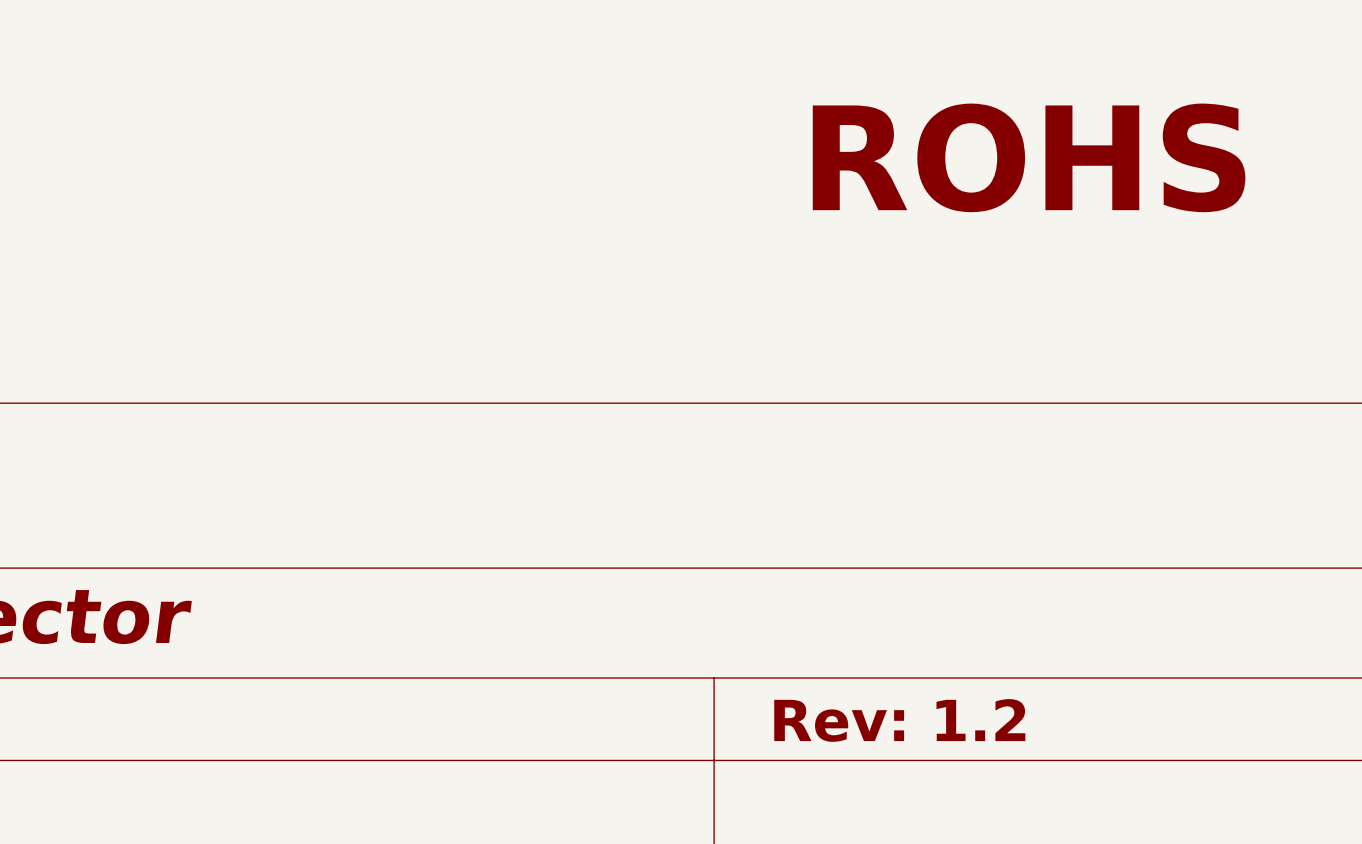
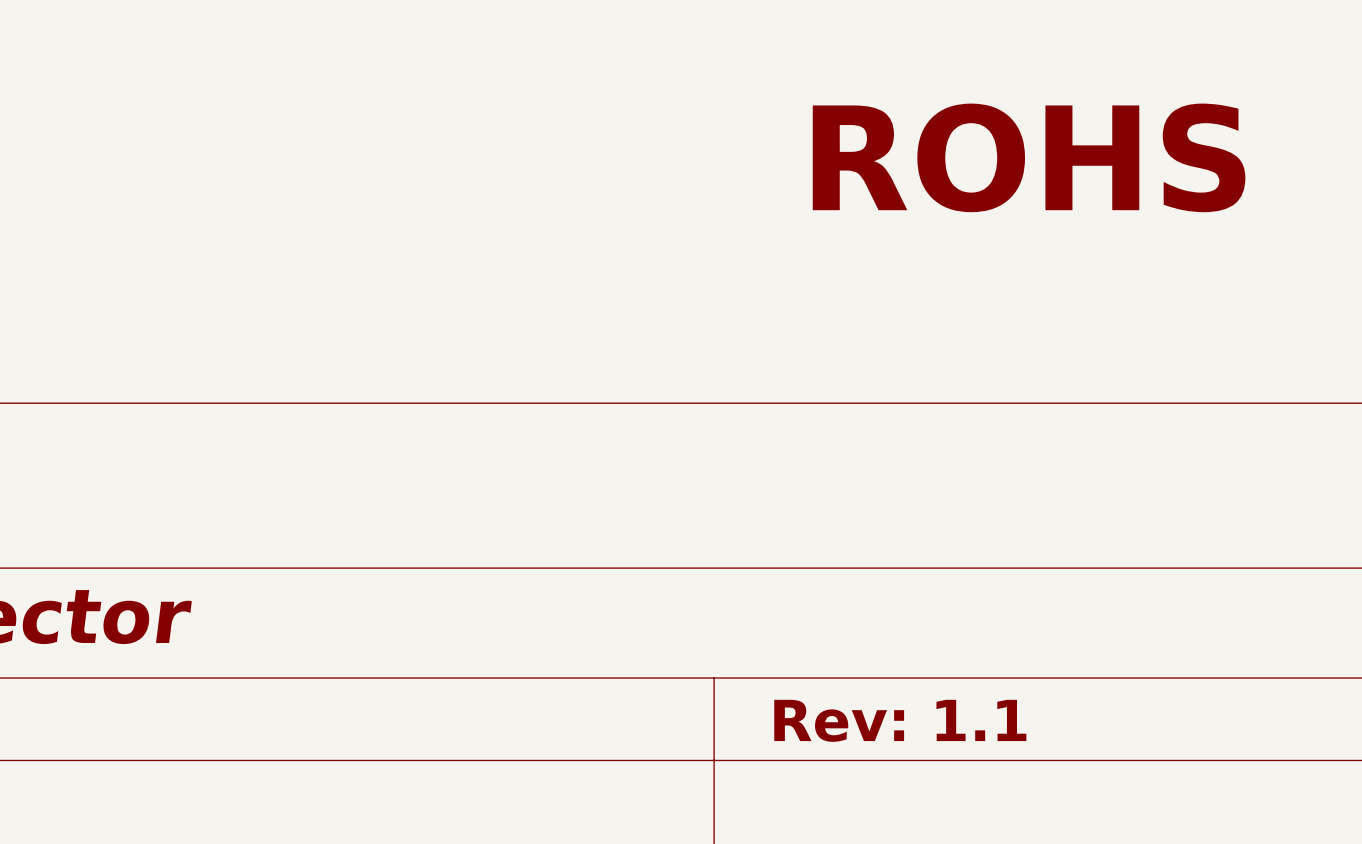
title block: Rev: 1.2 (899, 720) -> Rev: 1.1 (900, 720)

